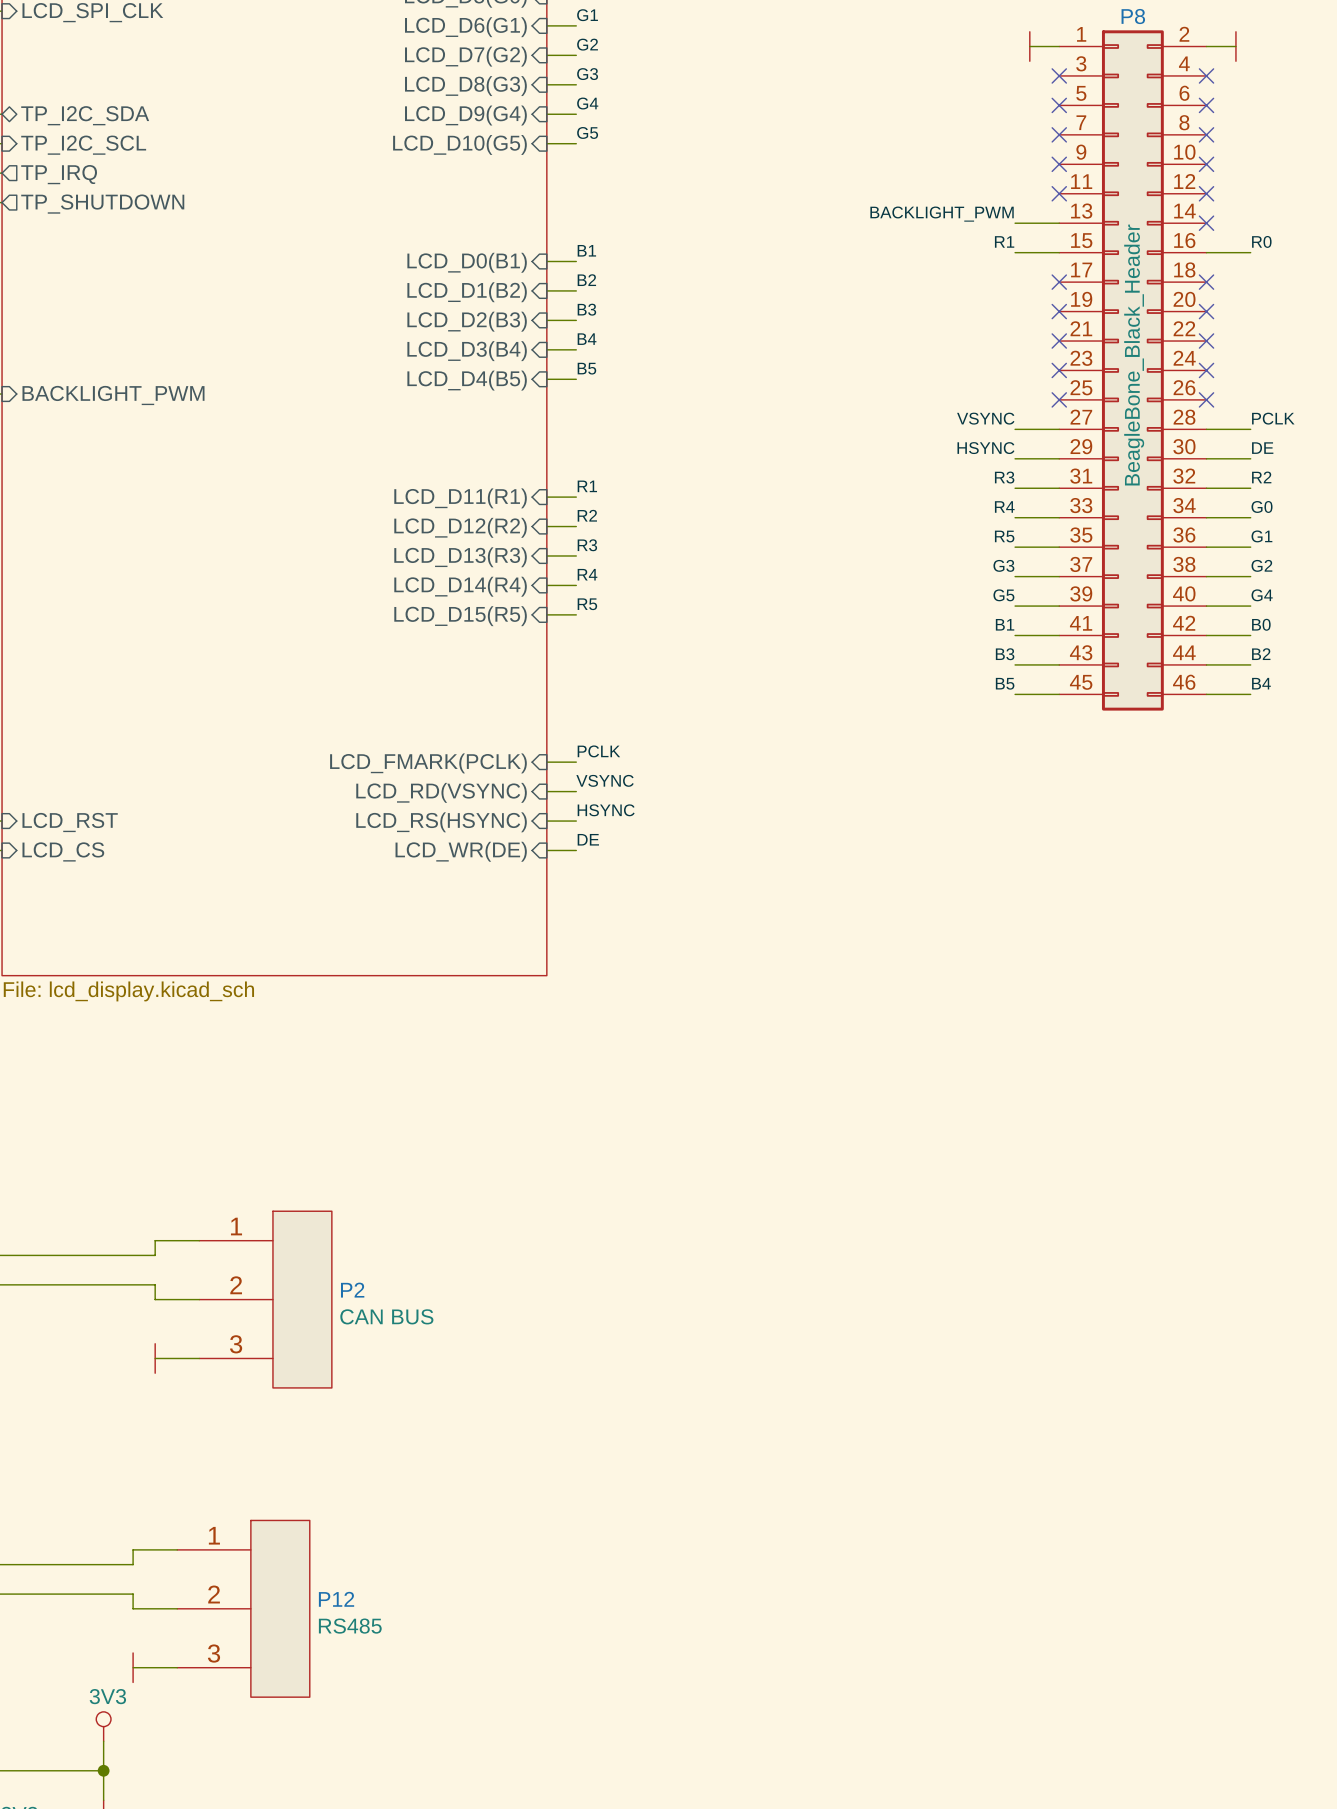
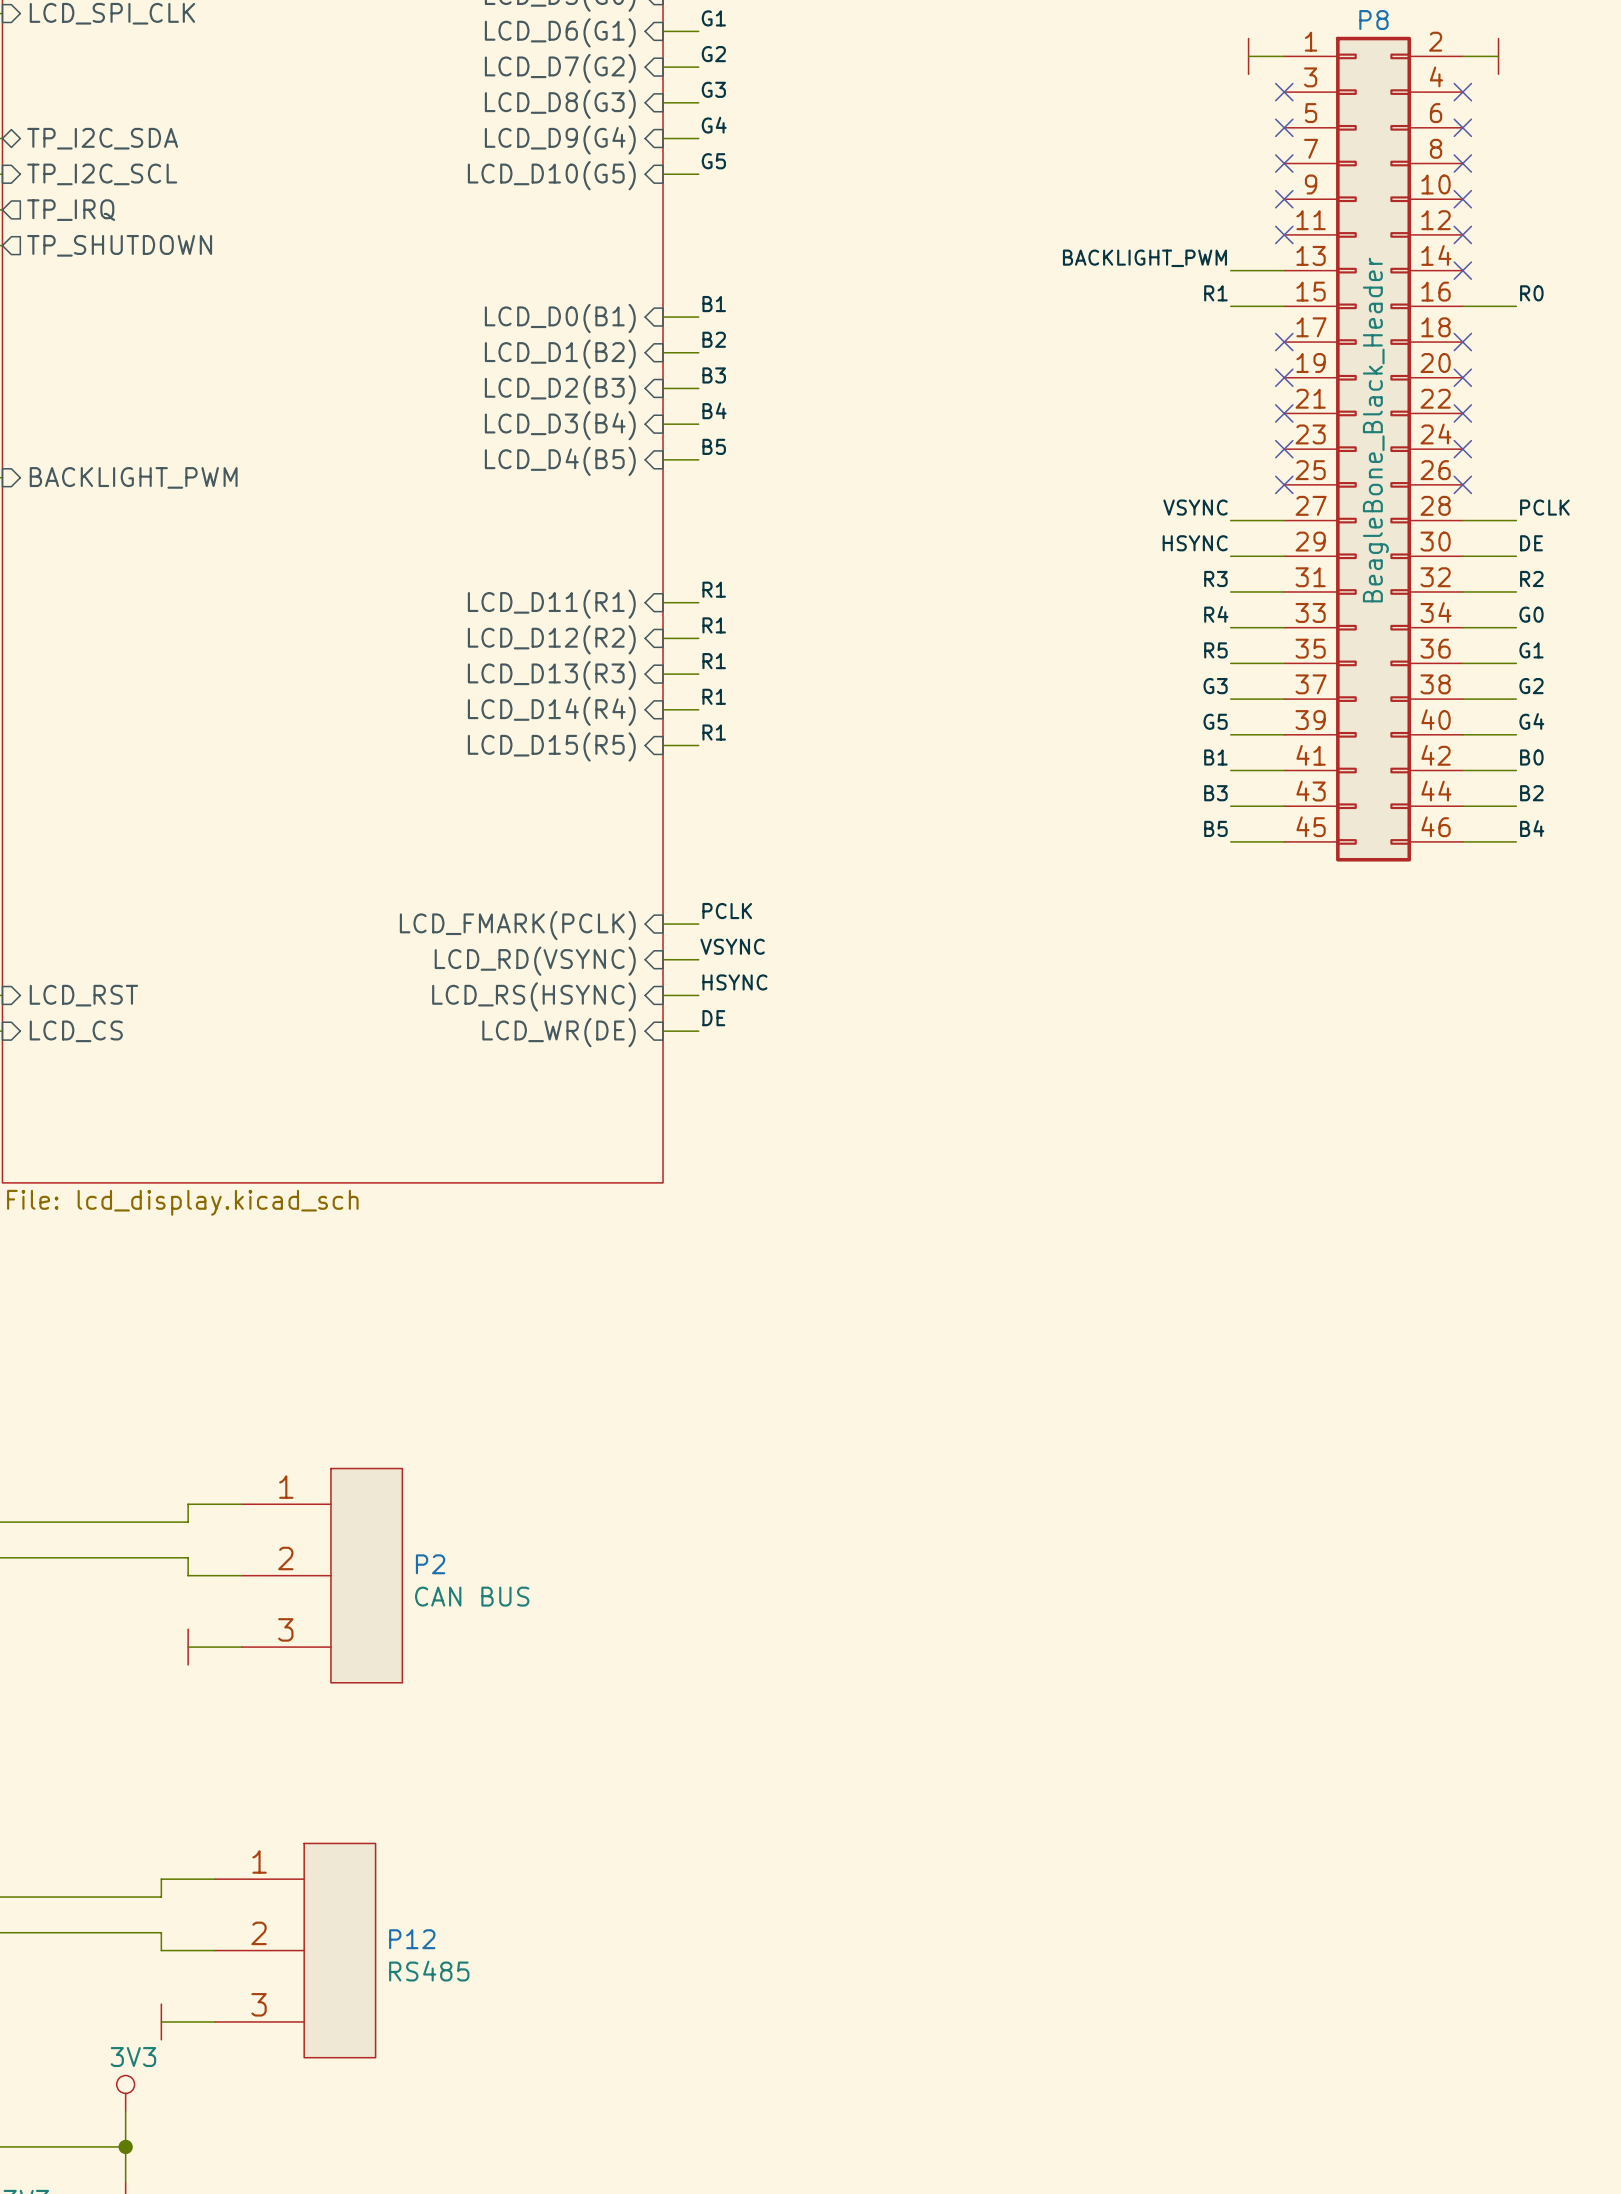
label: R2 (587, 515) -> R1 (714, 625)
label: R3 (587, 545) -> R1 (714, 661)
label: R4 (587, 574) -> R1 (714, 696)
label: R5 (587, 604) -> R1 (714, 732)

